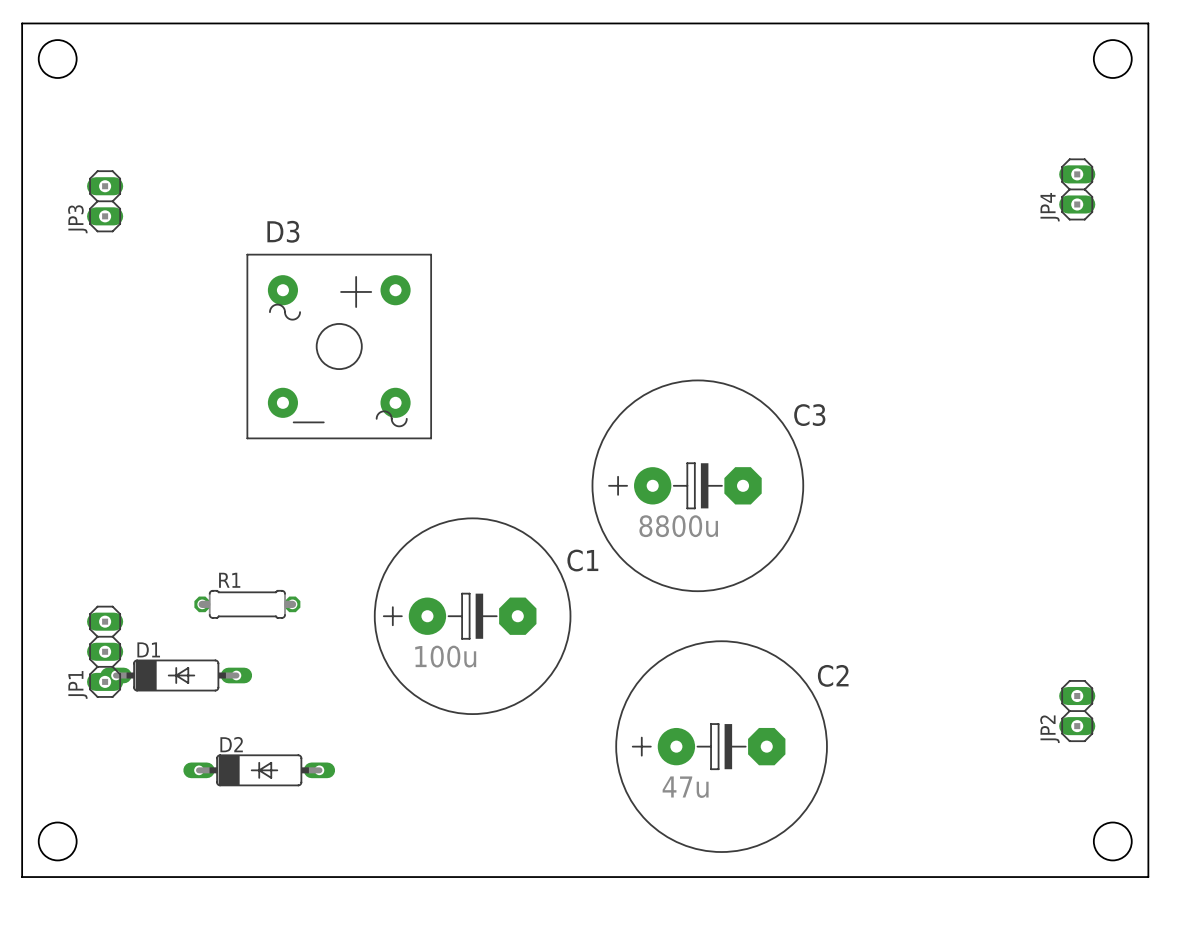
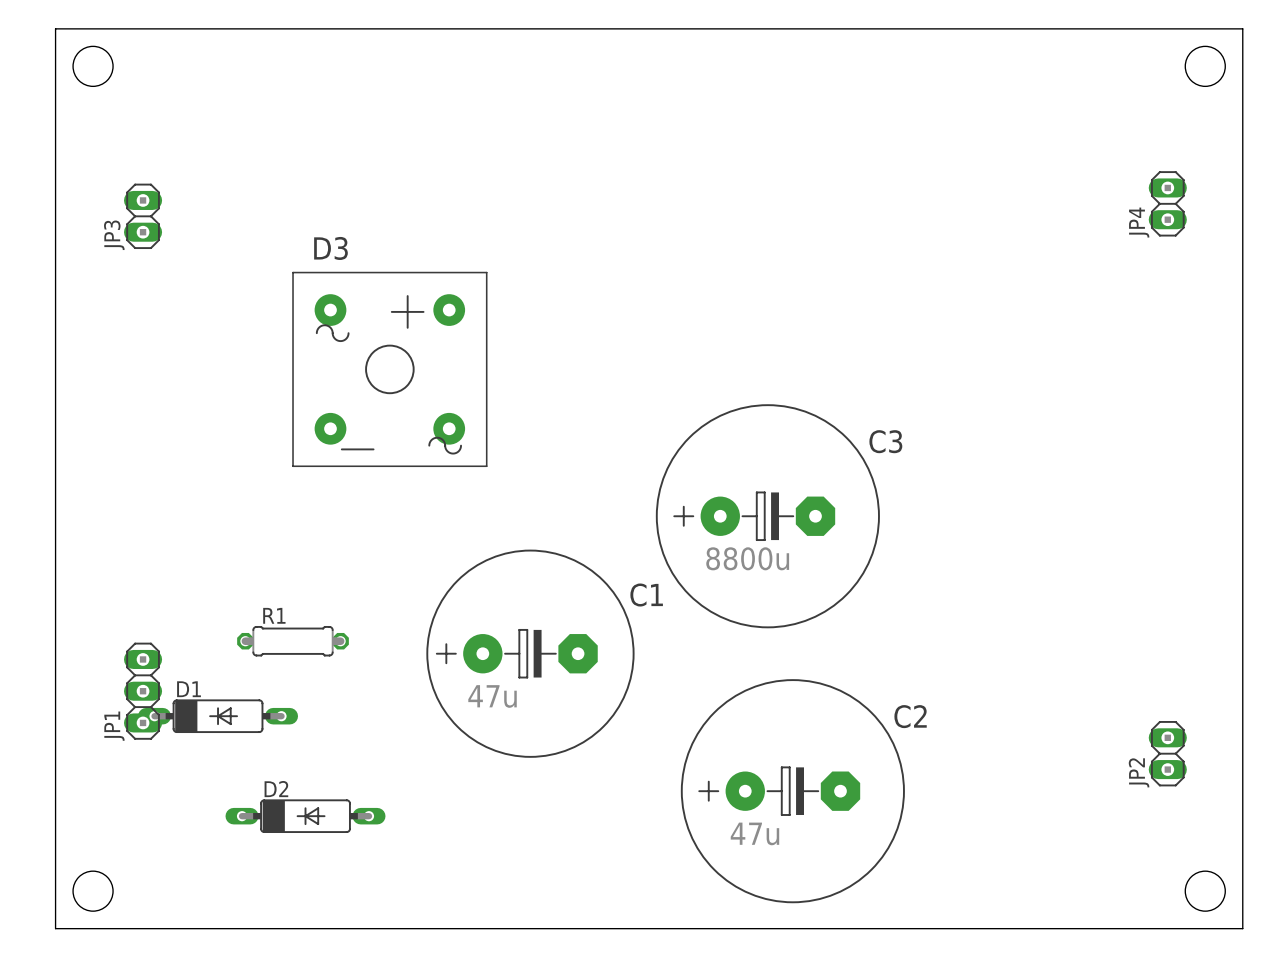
C1 value: 100u (445, 656) -> 47u (492, 696)

